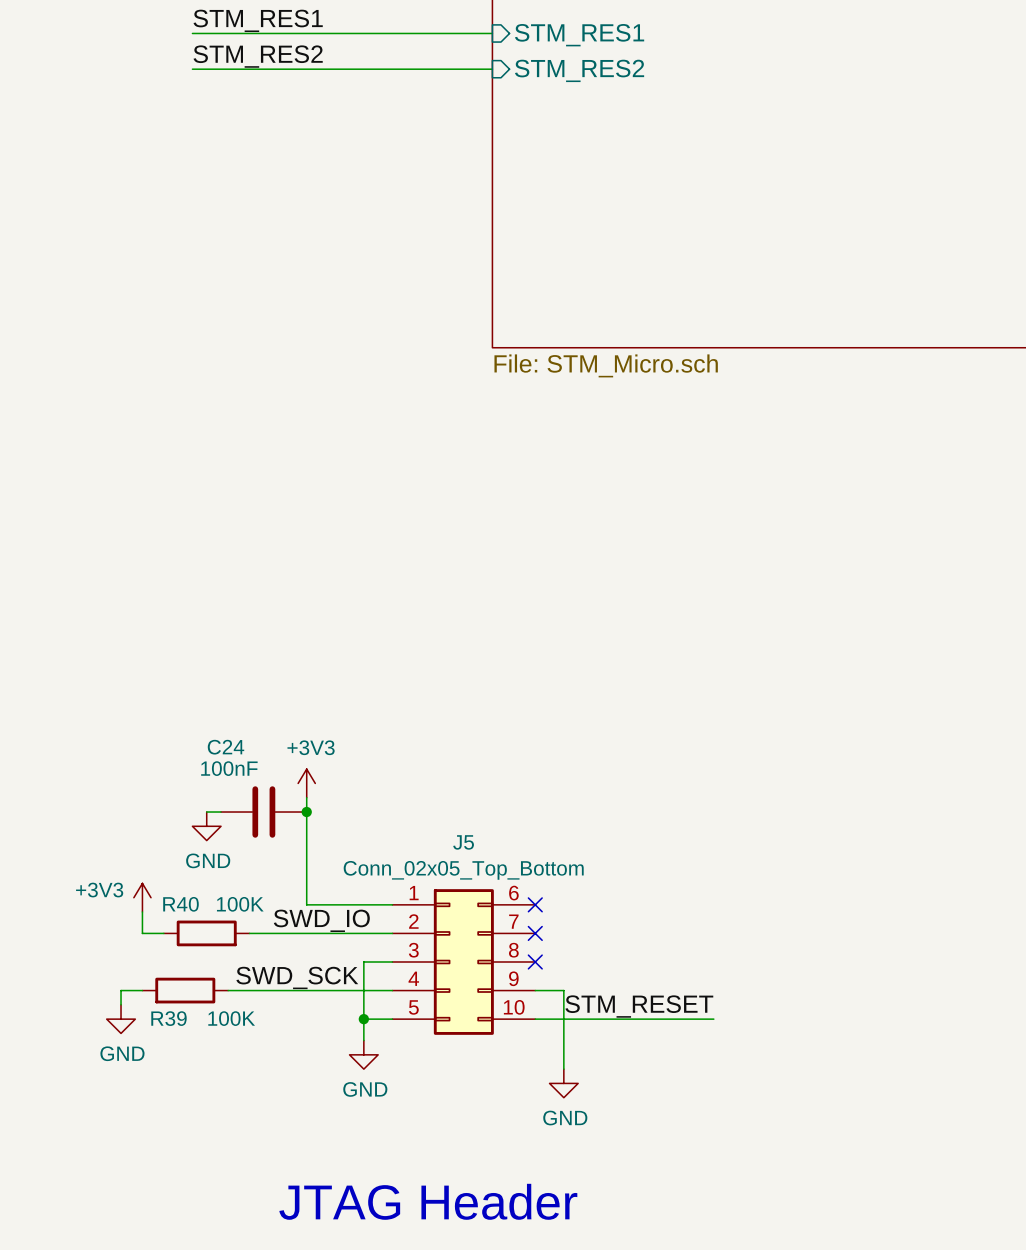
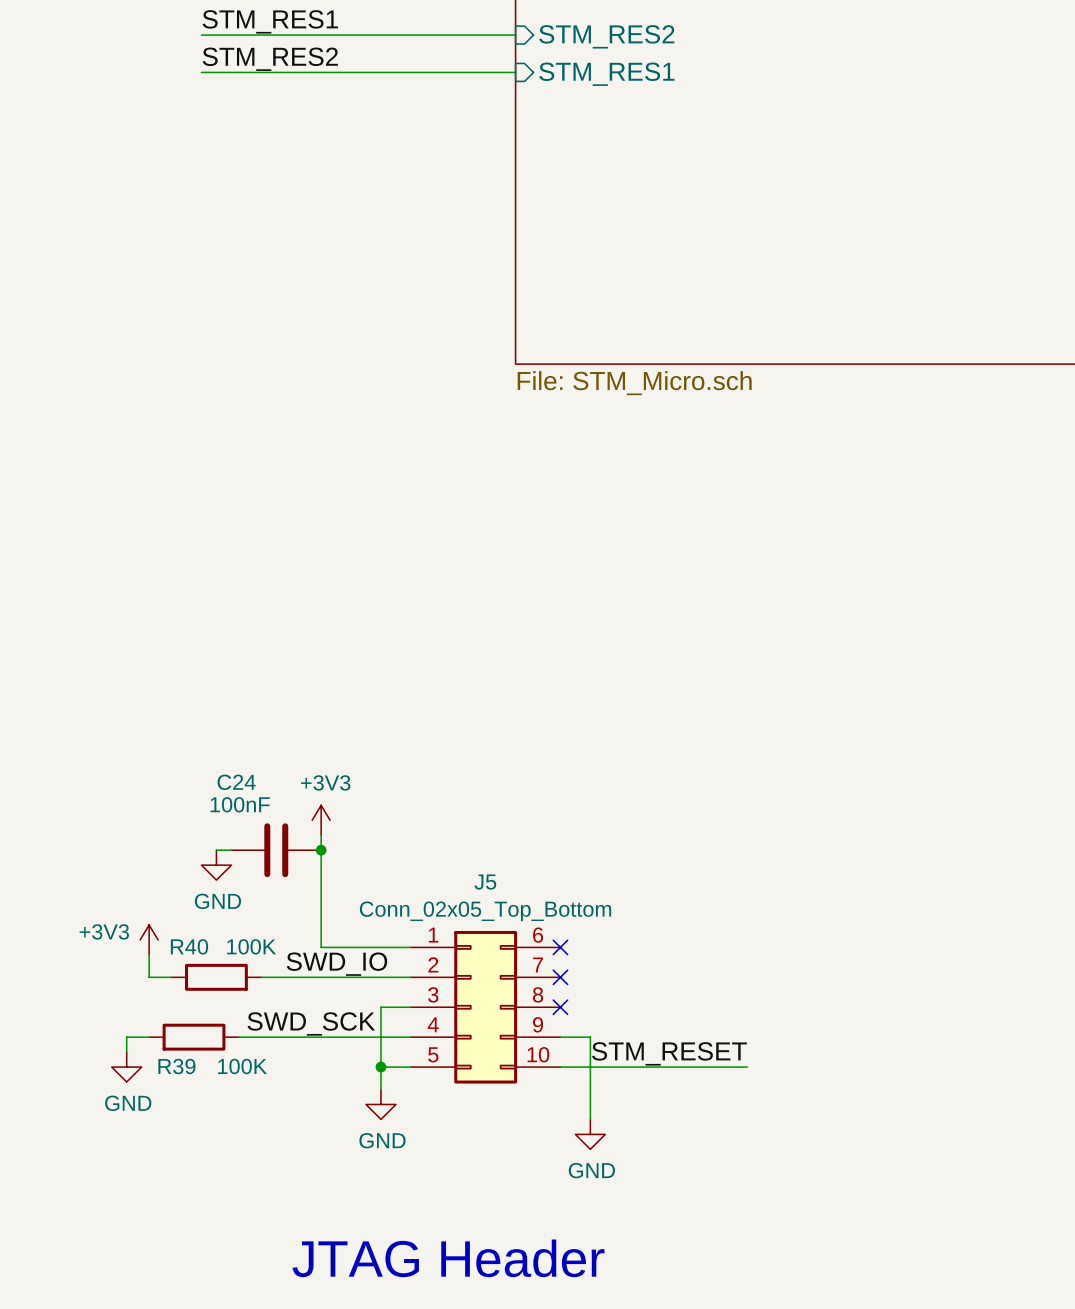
sheet pin: STM_RES1 (579, 35) -> STM_RES2 (606, 36)
sheet pin: STM_RES2 (579, 70) -> STM_RES1 (606, 74)

